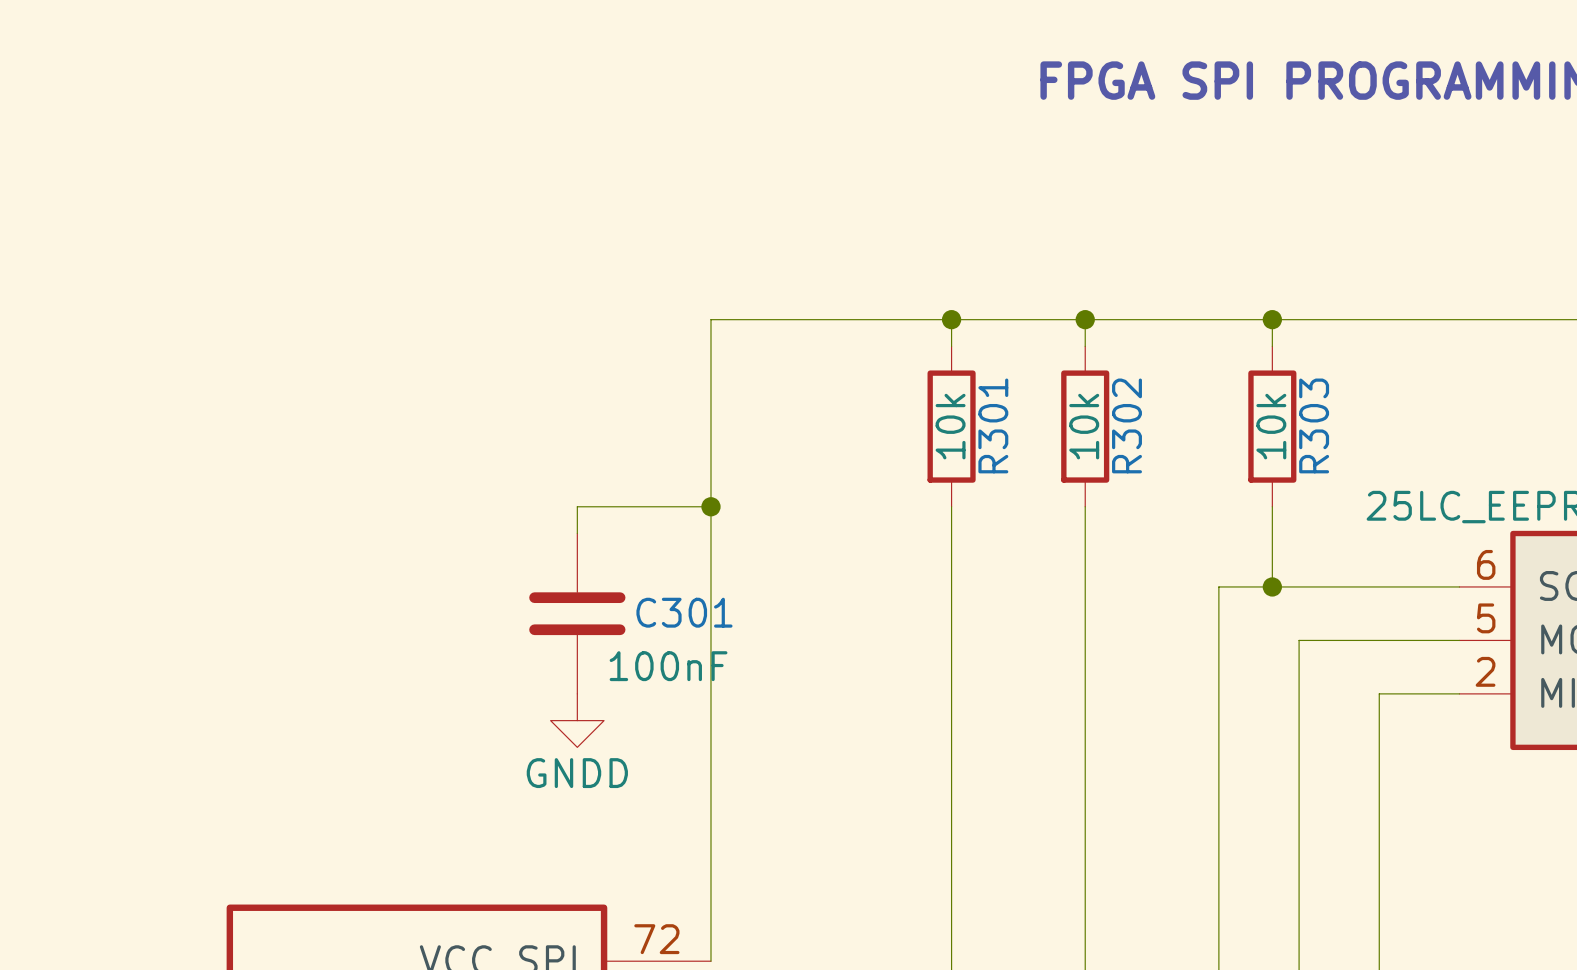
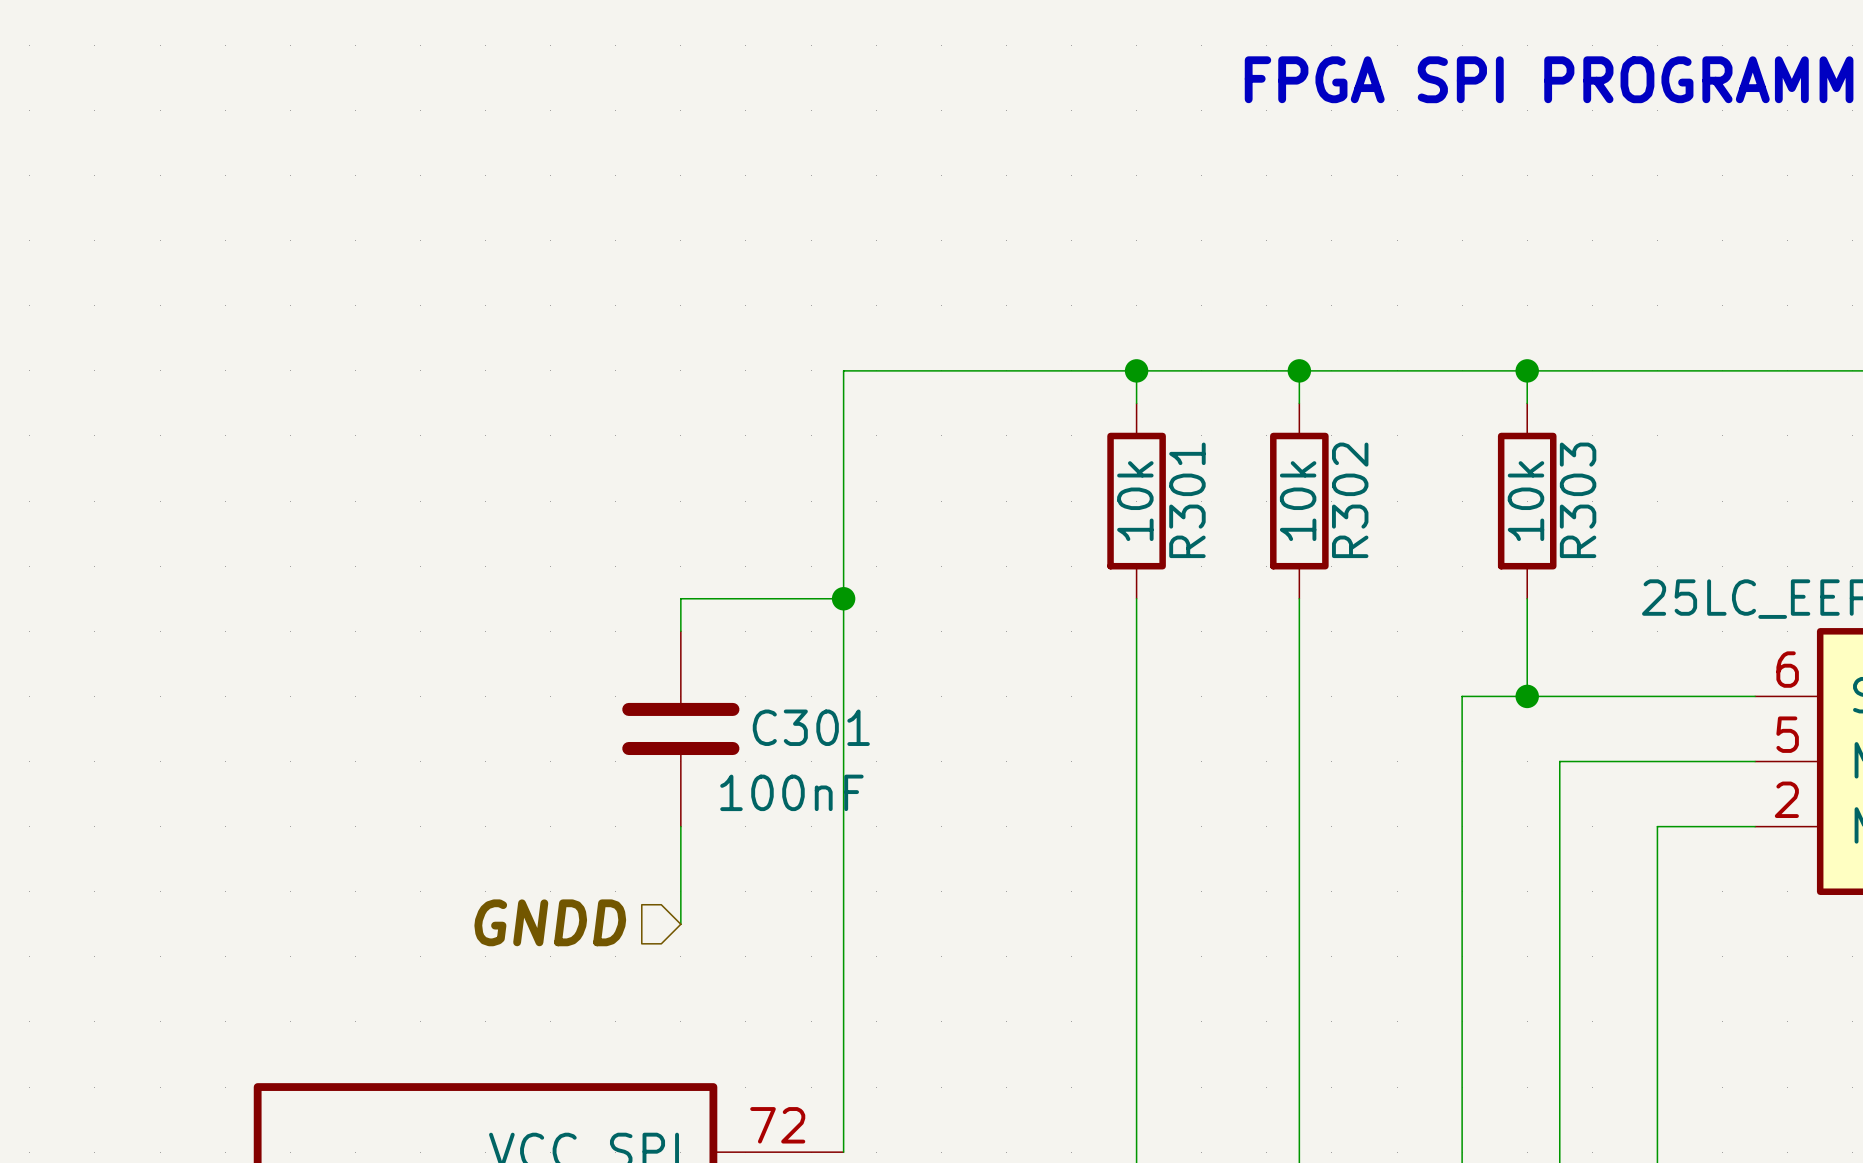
wire: none -> (680, 826) (680, 924)
power symbol: GNDD (577, 720) -> none
hierarchical label: none -> GNDD (550, 922)

